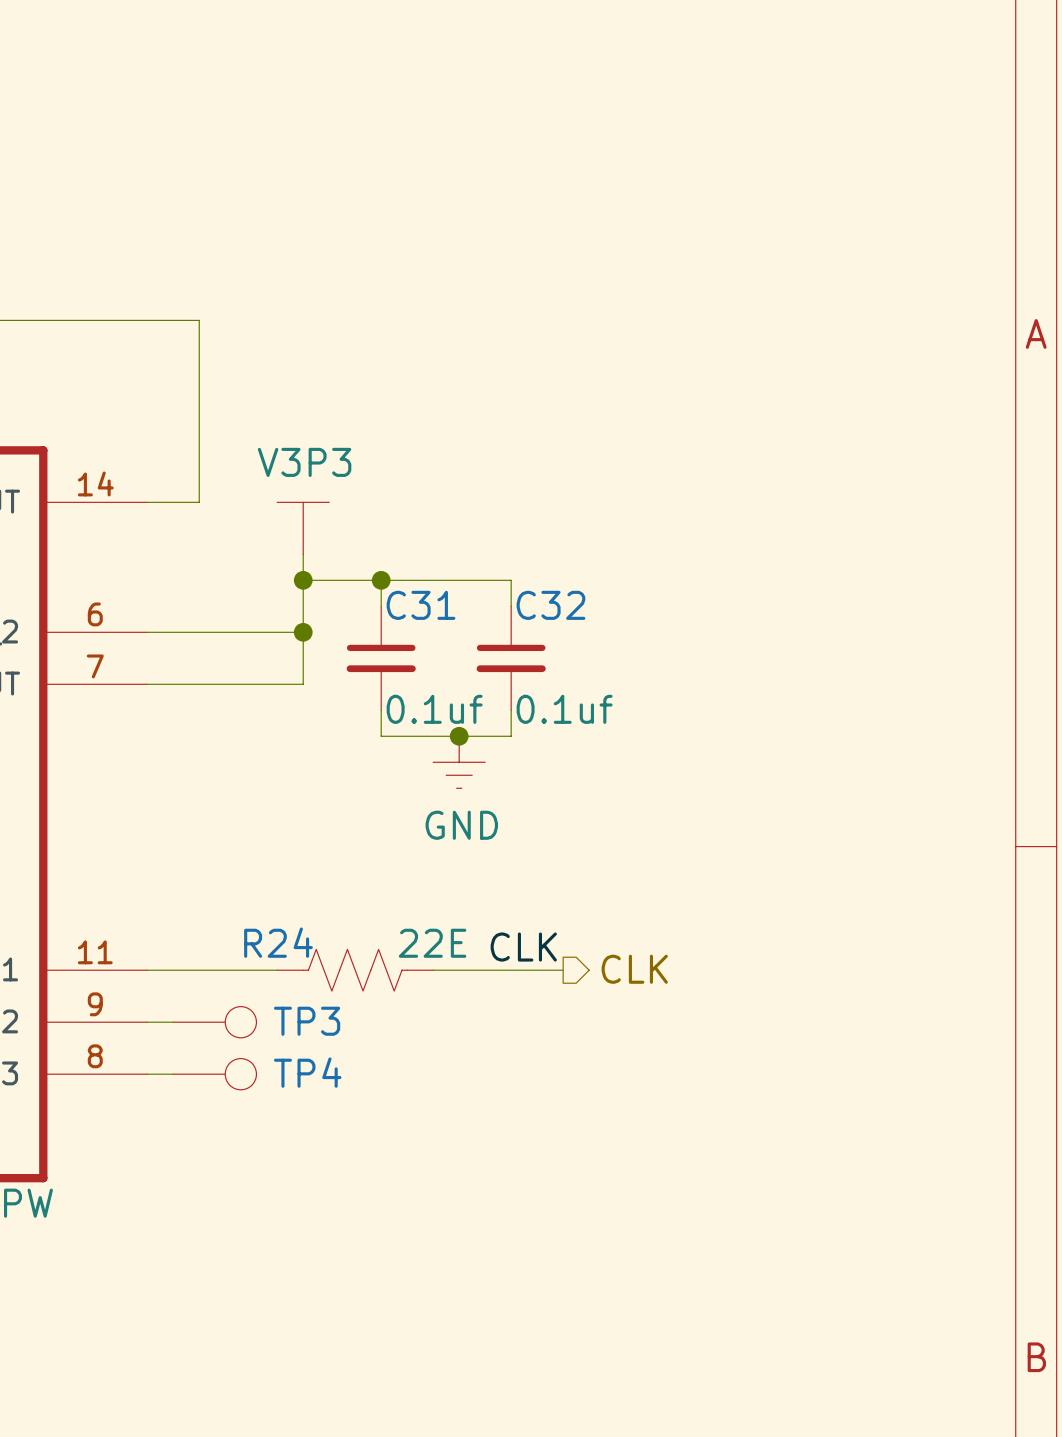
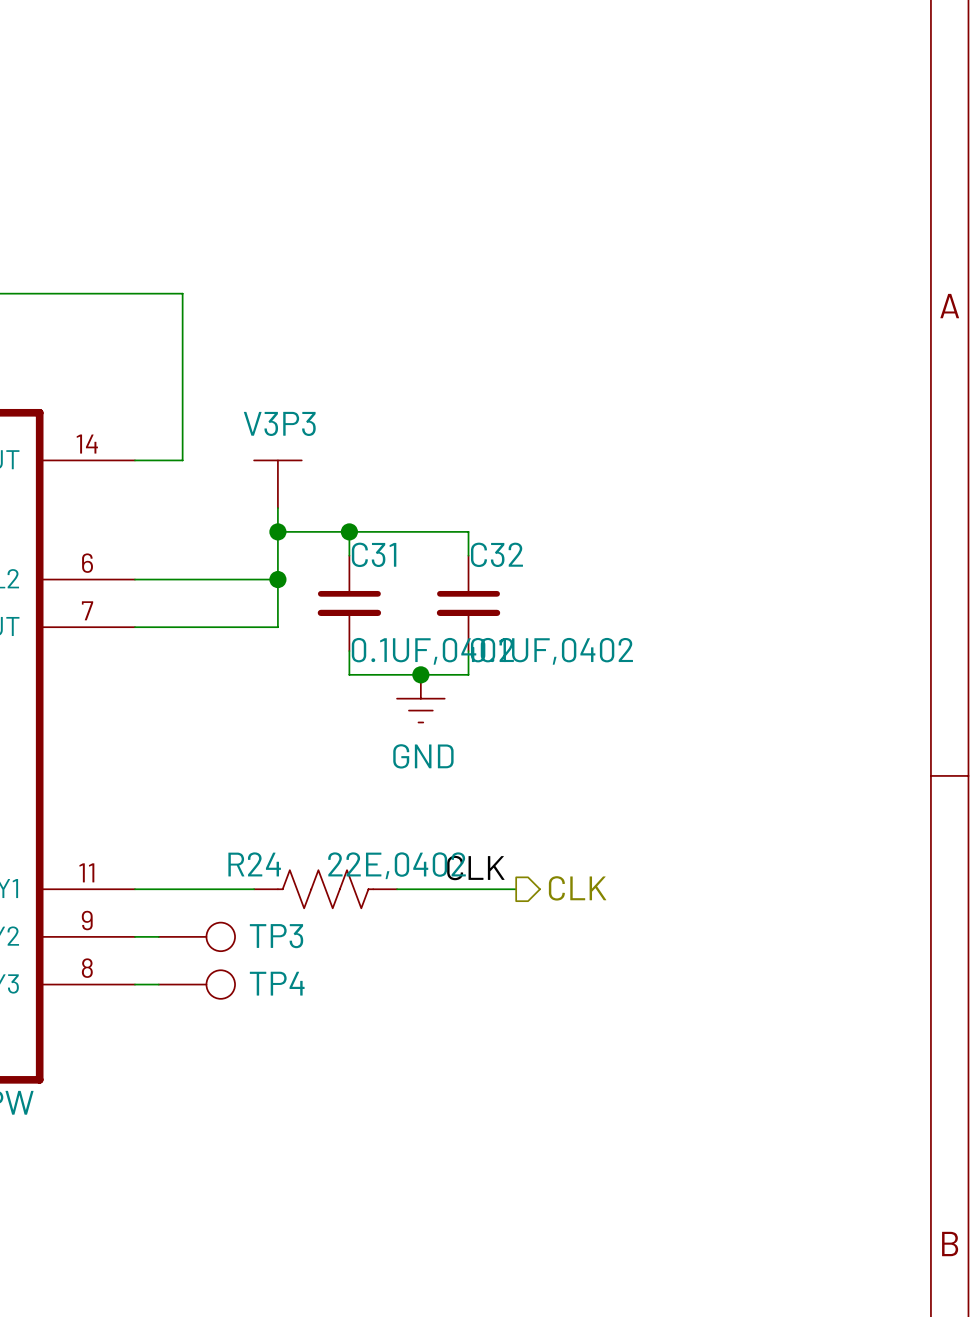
C31 value: 0.1uf (434, 709) -> 0.1UF,0402 (432, 651)
C32 value: 0.1uf (564, 709) -> 0.1UF,0402 (551, 651)
R24 value: 22E (432, 943) -> 22E,0402 (397, 865)

